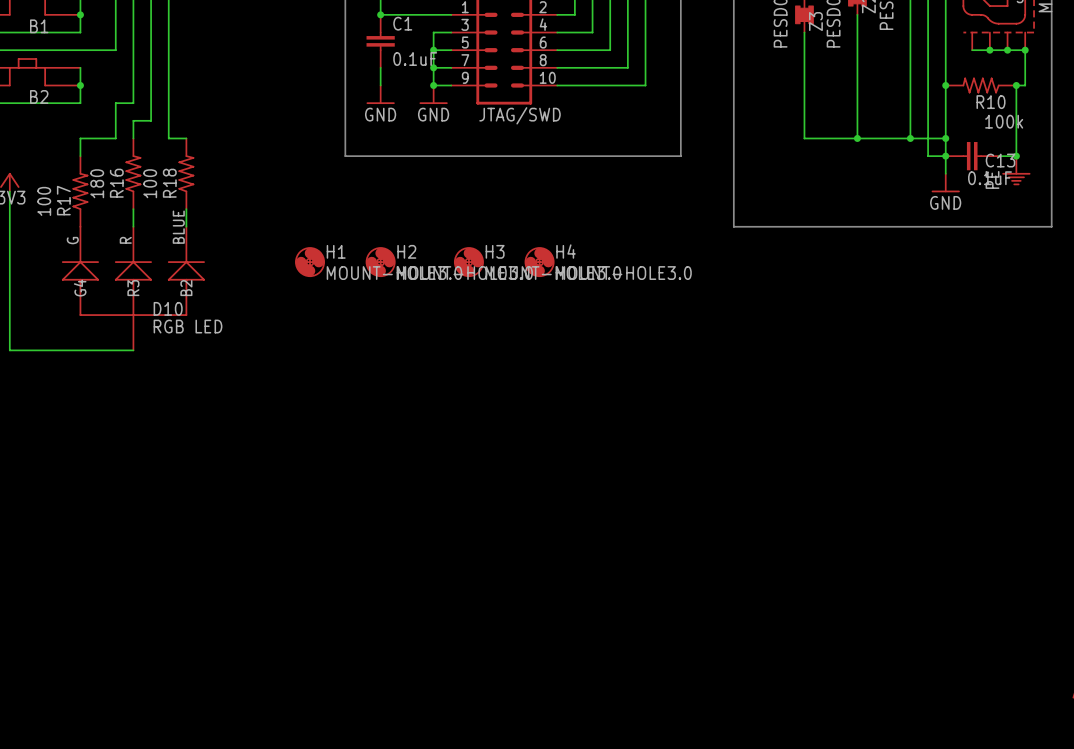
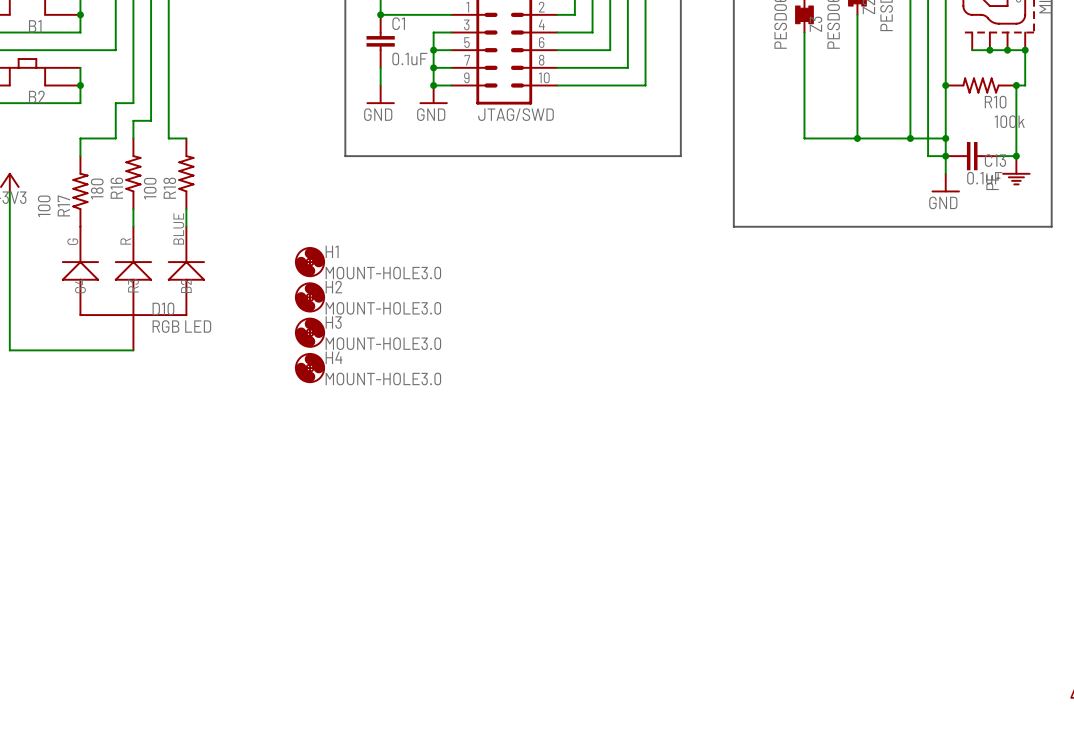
H2 position: (380, 262) -> (310, 297)
H3 position: (468, 262) -> (310, 332)
H4 position: (539, 262) -> (310, 368)

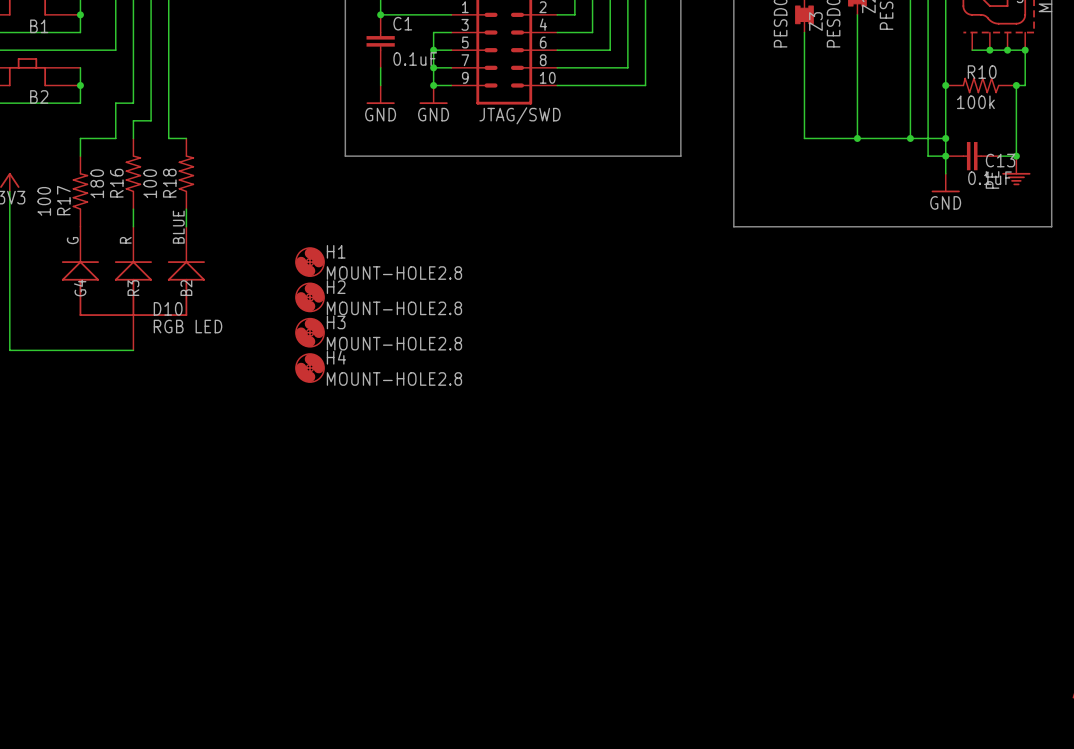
R10 name position: R10 (995, 102) -> R10 (982, 72)
R10 value position: 100k (1009, 121) -> 100k (975, 102)
H1 value: MOUNT-HOLE3.0 (383, 273) -> MOUNT-HOLE2.8 (394, 273)
H2 value: MOUNT-HOLE3.0 (383, 308) -> MOUNT-HOLE2.8 (394, 308)
H3 value: MOUNT-HOLE3.0 (383, 343) -> MOUNT-HOLE2.8 (394, 343)
H4 value: MOUNT-HOLE3.0 (383, 379) -> MOUNT-HOLE2.8 (394, 378)

